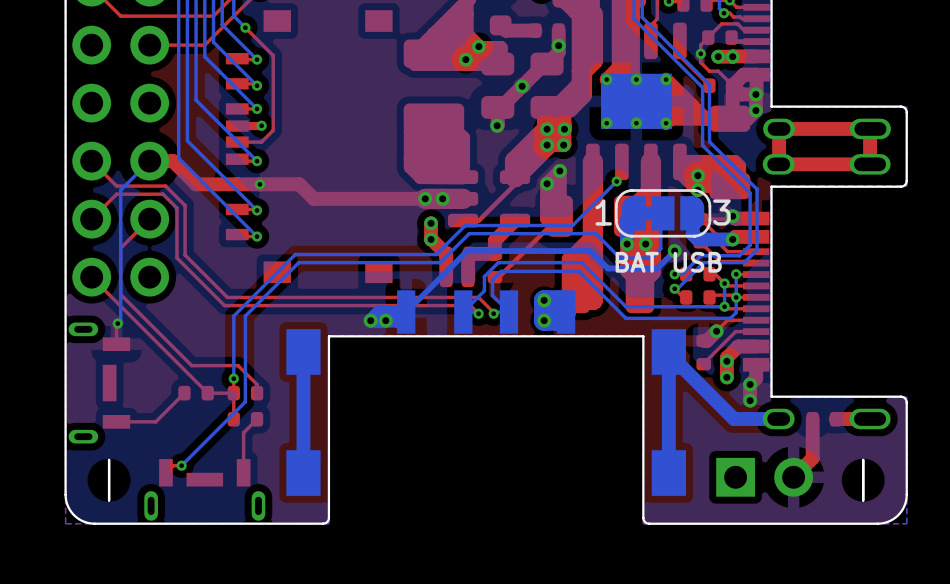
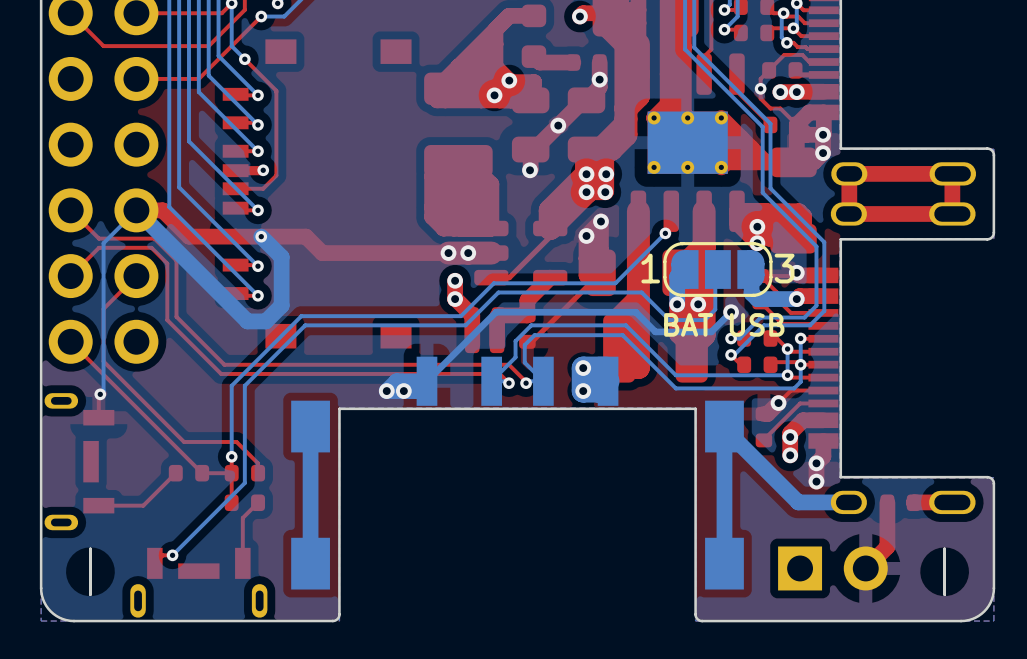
bottom track: none -> (136, 210) (247, 321) (265, 321) (281, 305) (281, 257) (261, 236)
part footprint: [614, 189, 712, 238] -> [663, 242, 773, 297]

